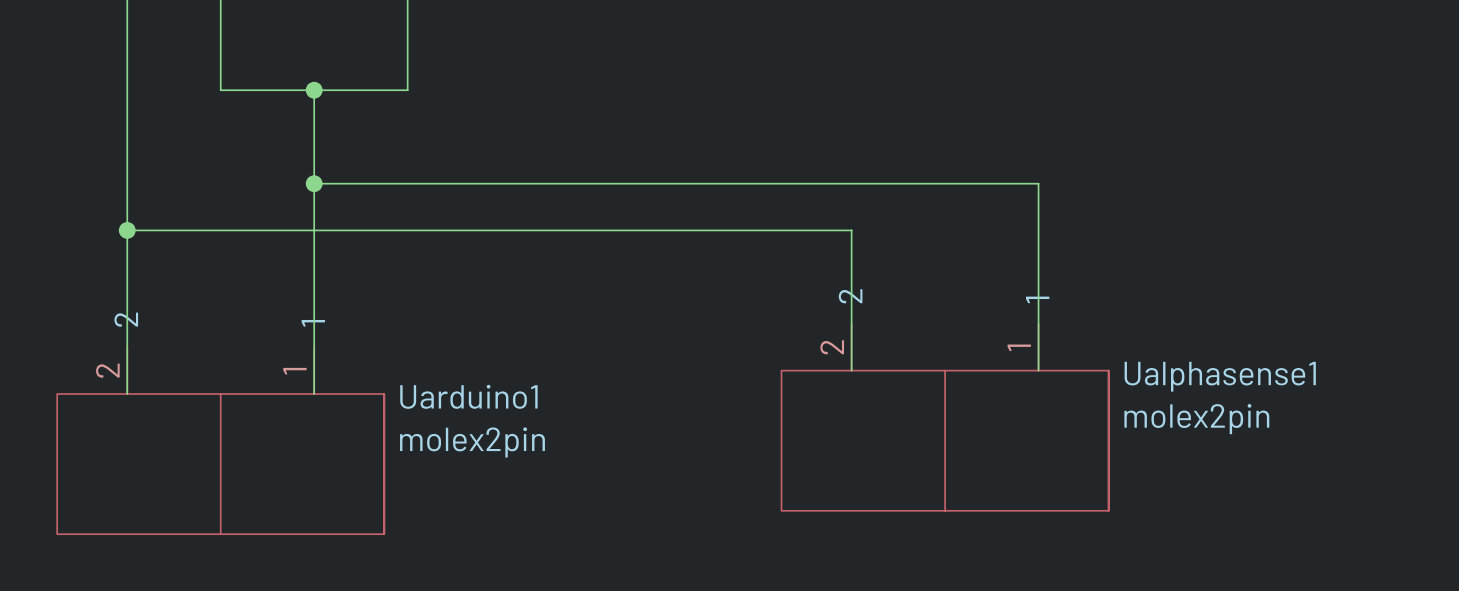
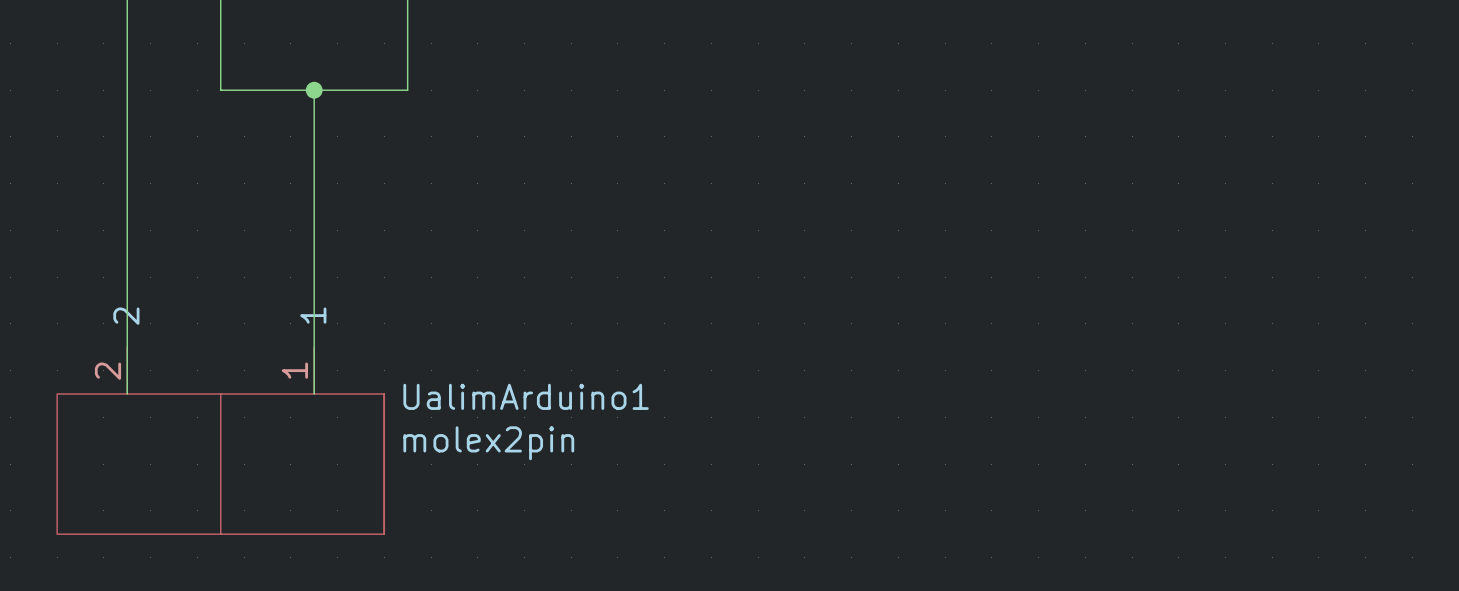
wire: (314, 183) (1038, 183) (1038, 370) -> none
junction: (314, 183) -> none
wire: (127, 230) (851, 230) (851, 370) -> none
junction: (127, 230) -> none
Uarduino1 name: Uarduino1 (468, 396) -> UalimArduino1 (526, 396)
Ualphasense1: molex2pin (945, 417) -> none

